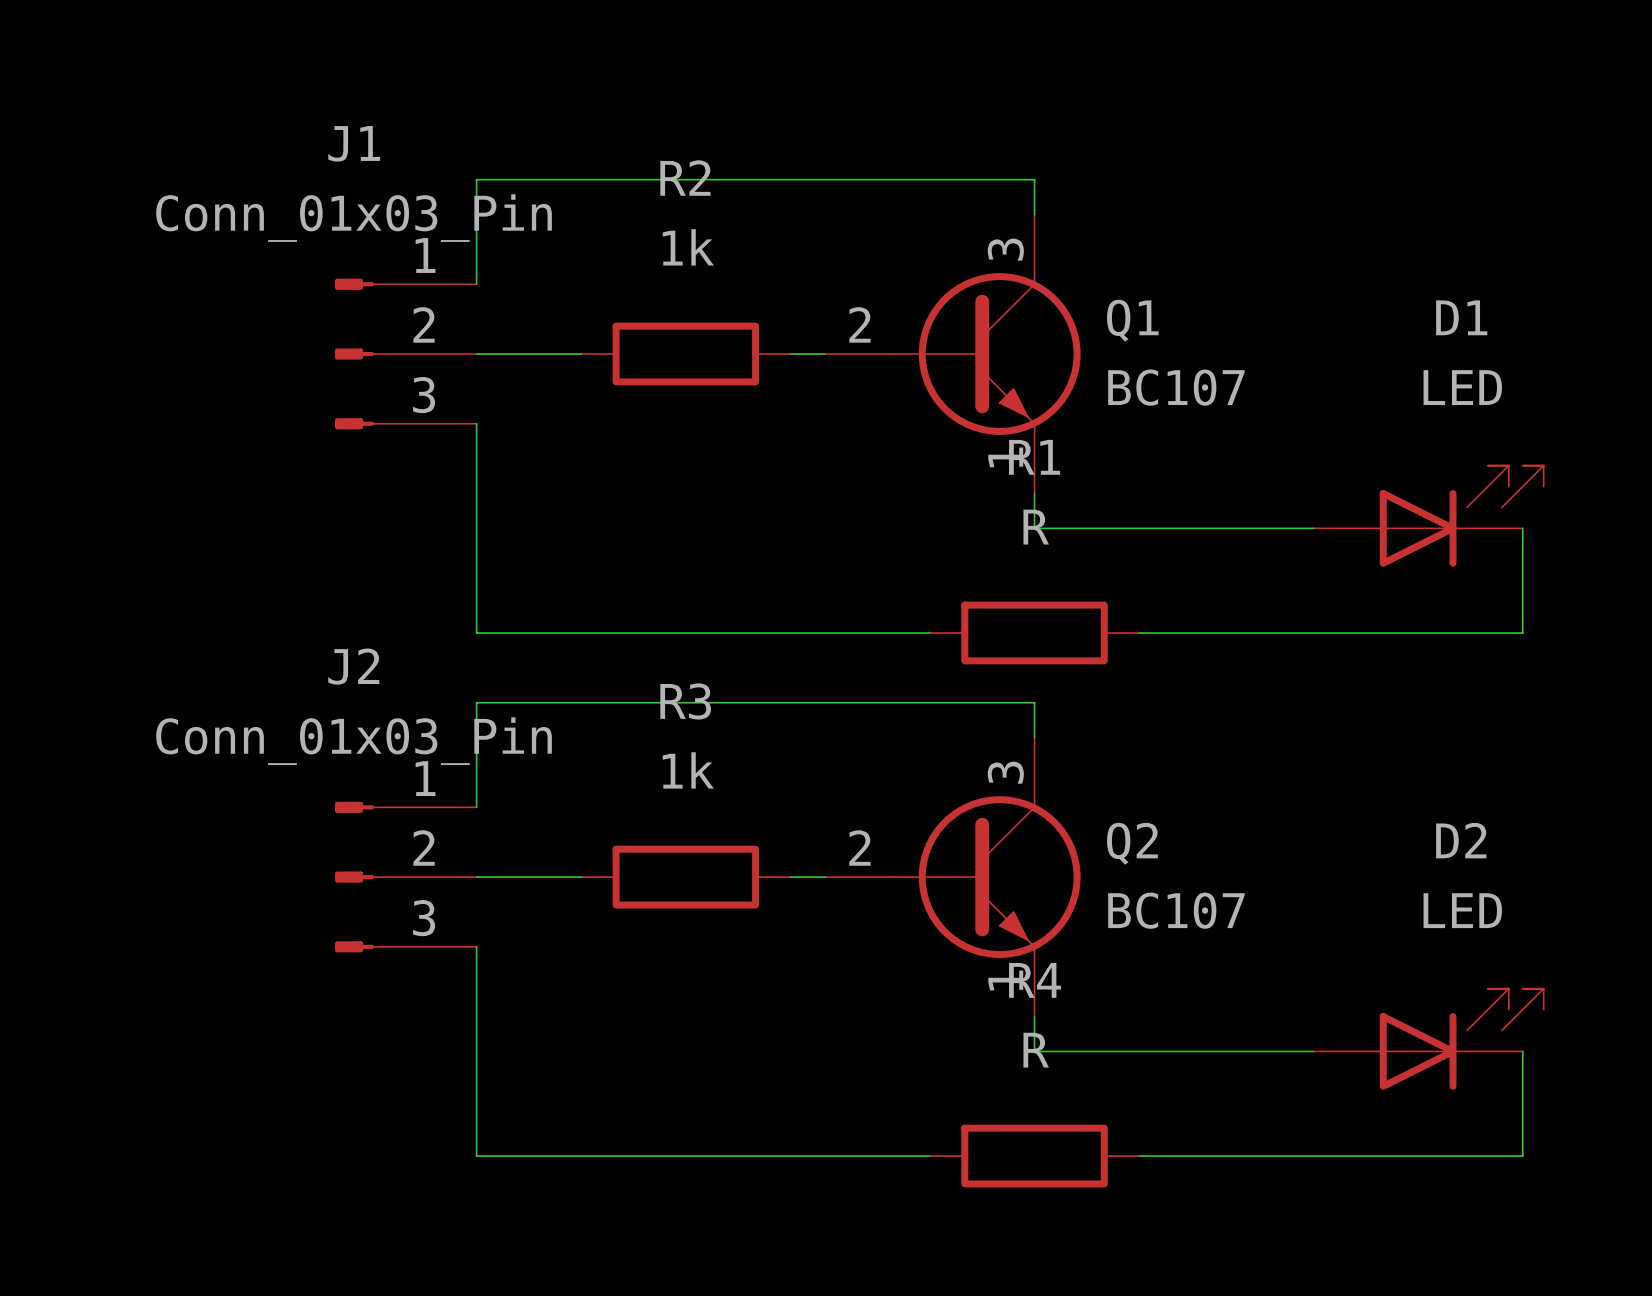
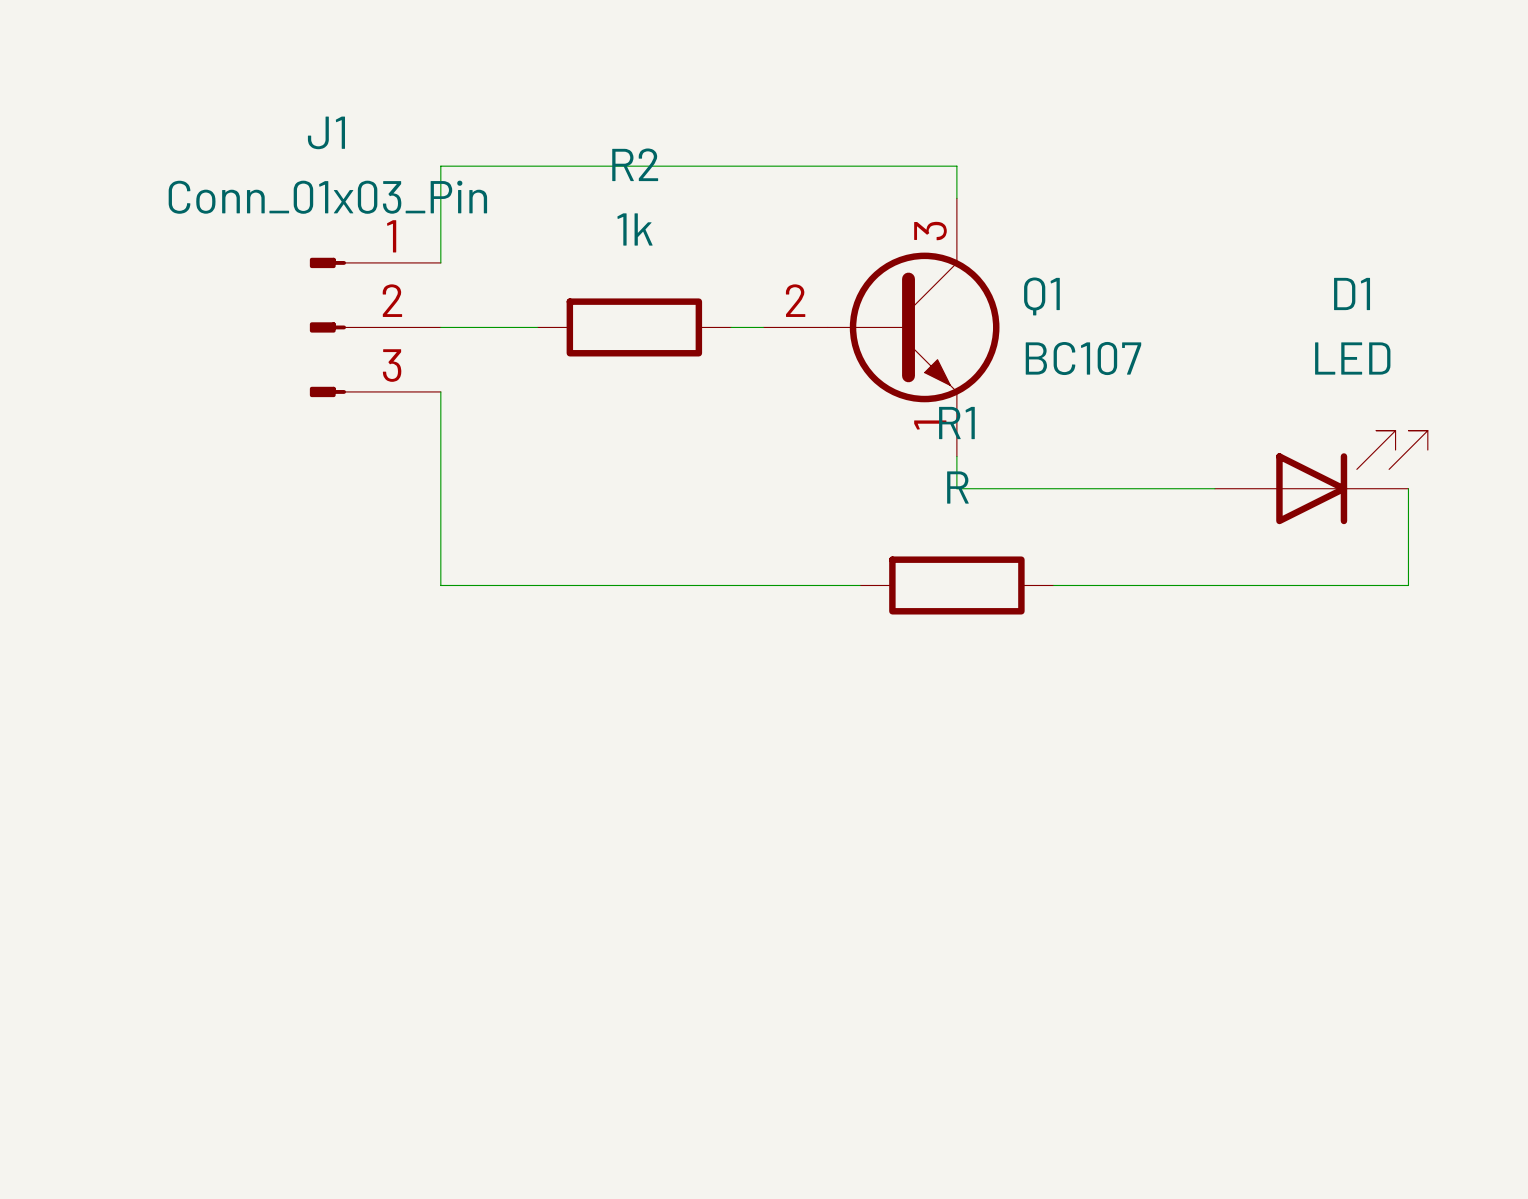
wire: (1034, 737) (1034, 702) (476, 702) (476, 807) -> none
J2: Conn_01x03_Pin (405, 877) -> none
wire: (476, 877) (581, 877) -> none
R3: 1k (685, 877) -> none
wire: (790, 877) (825, 877) -> none
Q2: BC107 (952, 877) -> none
wire: (476, 946) (476, 1156) (929, 1156) -> none
wire: (1034, 1016) (1034, 1051) (1313, 1051) -> none
D2: LED (1428, 1039) -> none
wire: (1522, 1051) (1522, 1156) (1139, 1156) -> none
R4: R (1034, 1156) -> none

